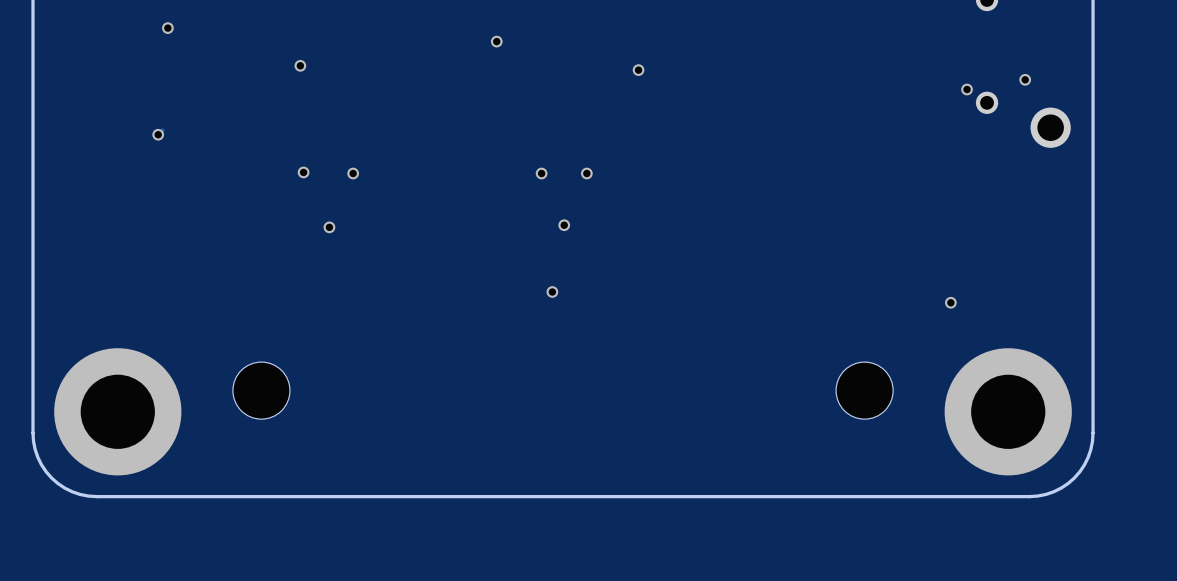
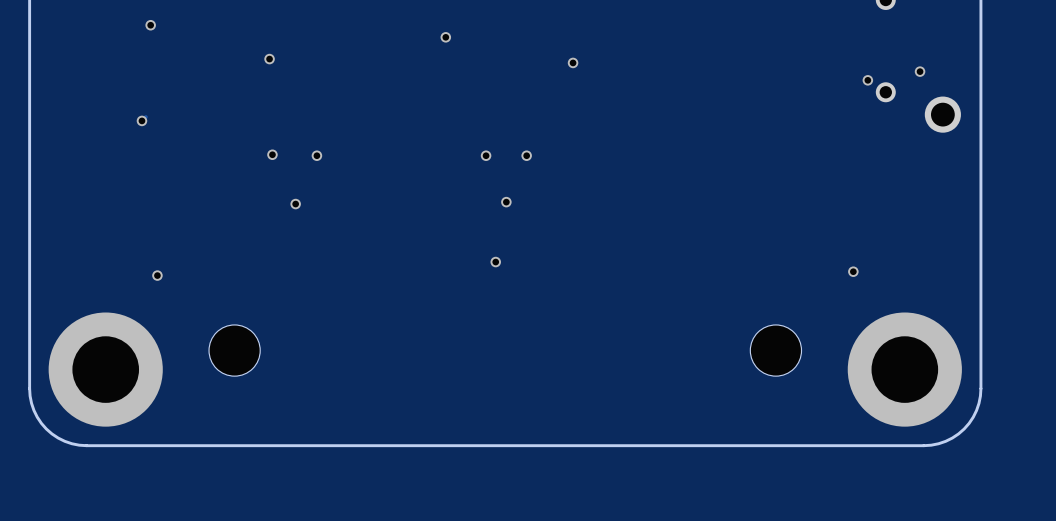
via: none -> (157, 275)

